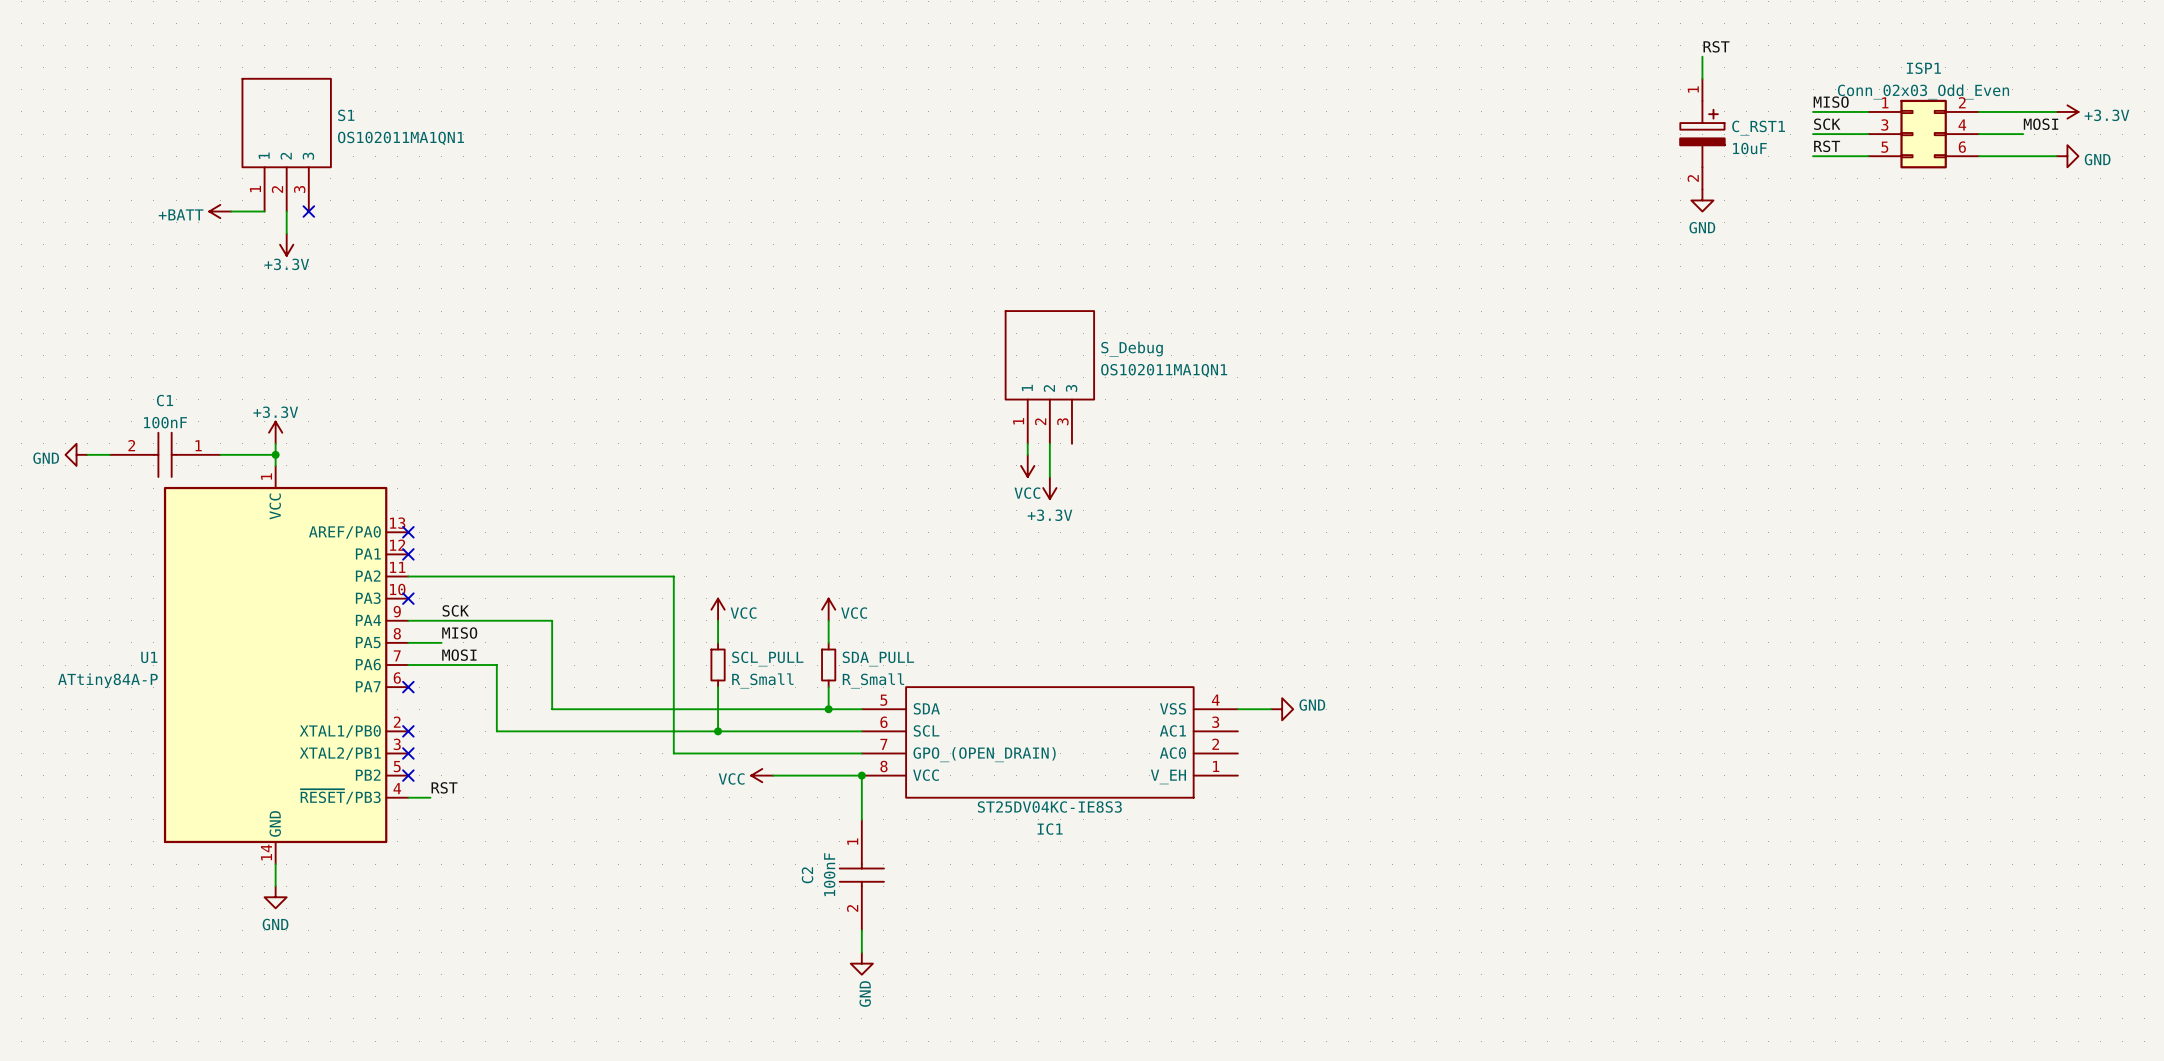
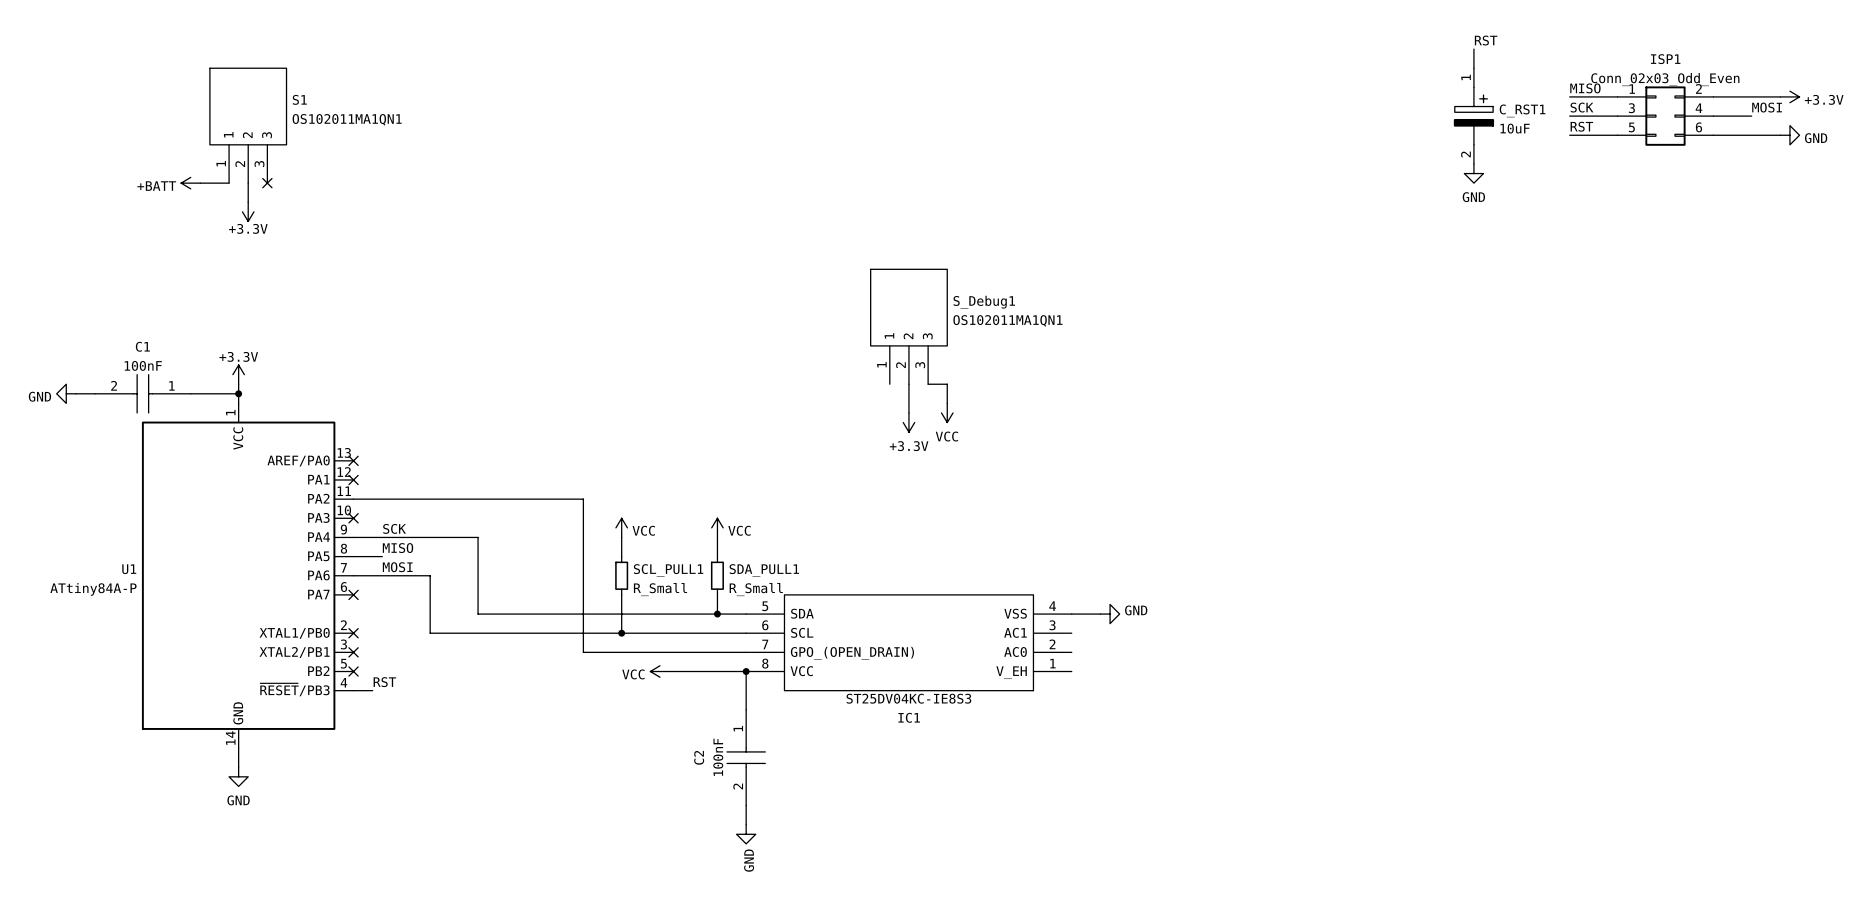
S_Debug name: S_Debug (1132, 349) -> S_Debug1 (984, 302)
wire: (1027, 443) (1027, 454) -> none
wire: none -> (928, 384) (947, 384) (947, 403)
power symbol position: VCC (1027, 465) -> VCC (947, 412)
SCL_PULL name: SCL_PULL (767, 659) -> SCL_PULL1 (668, 570)
SDA_PULL name: SDA_PULL (878, 659) -> SDA_PULL1 (764, 570)

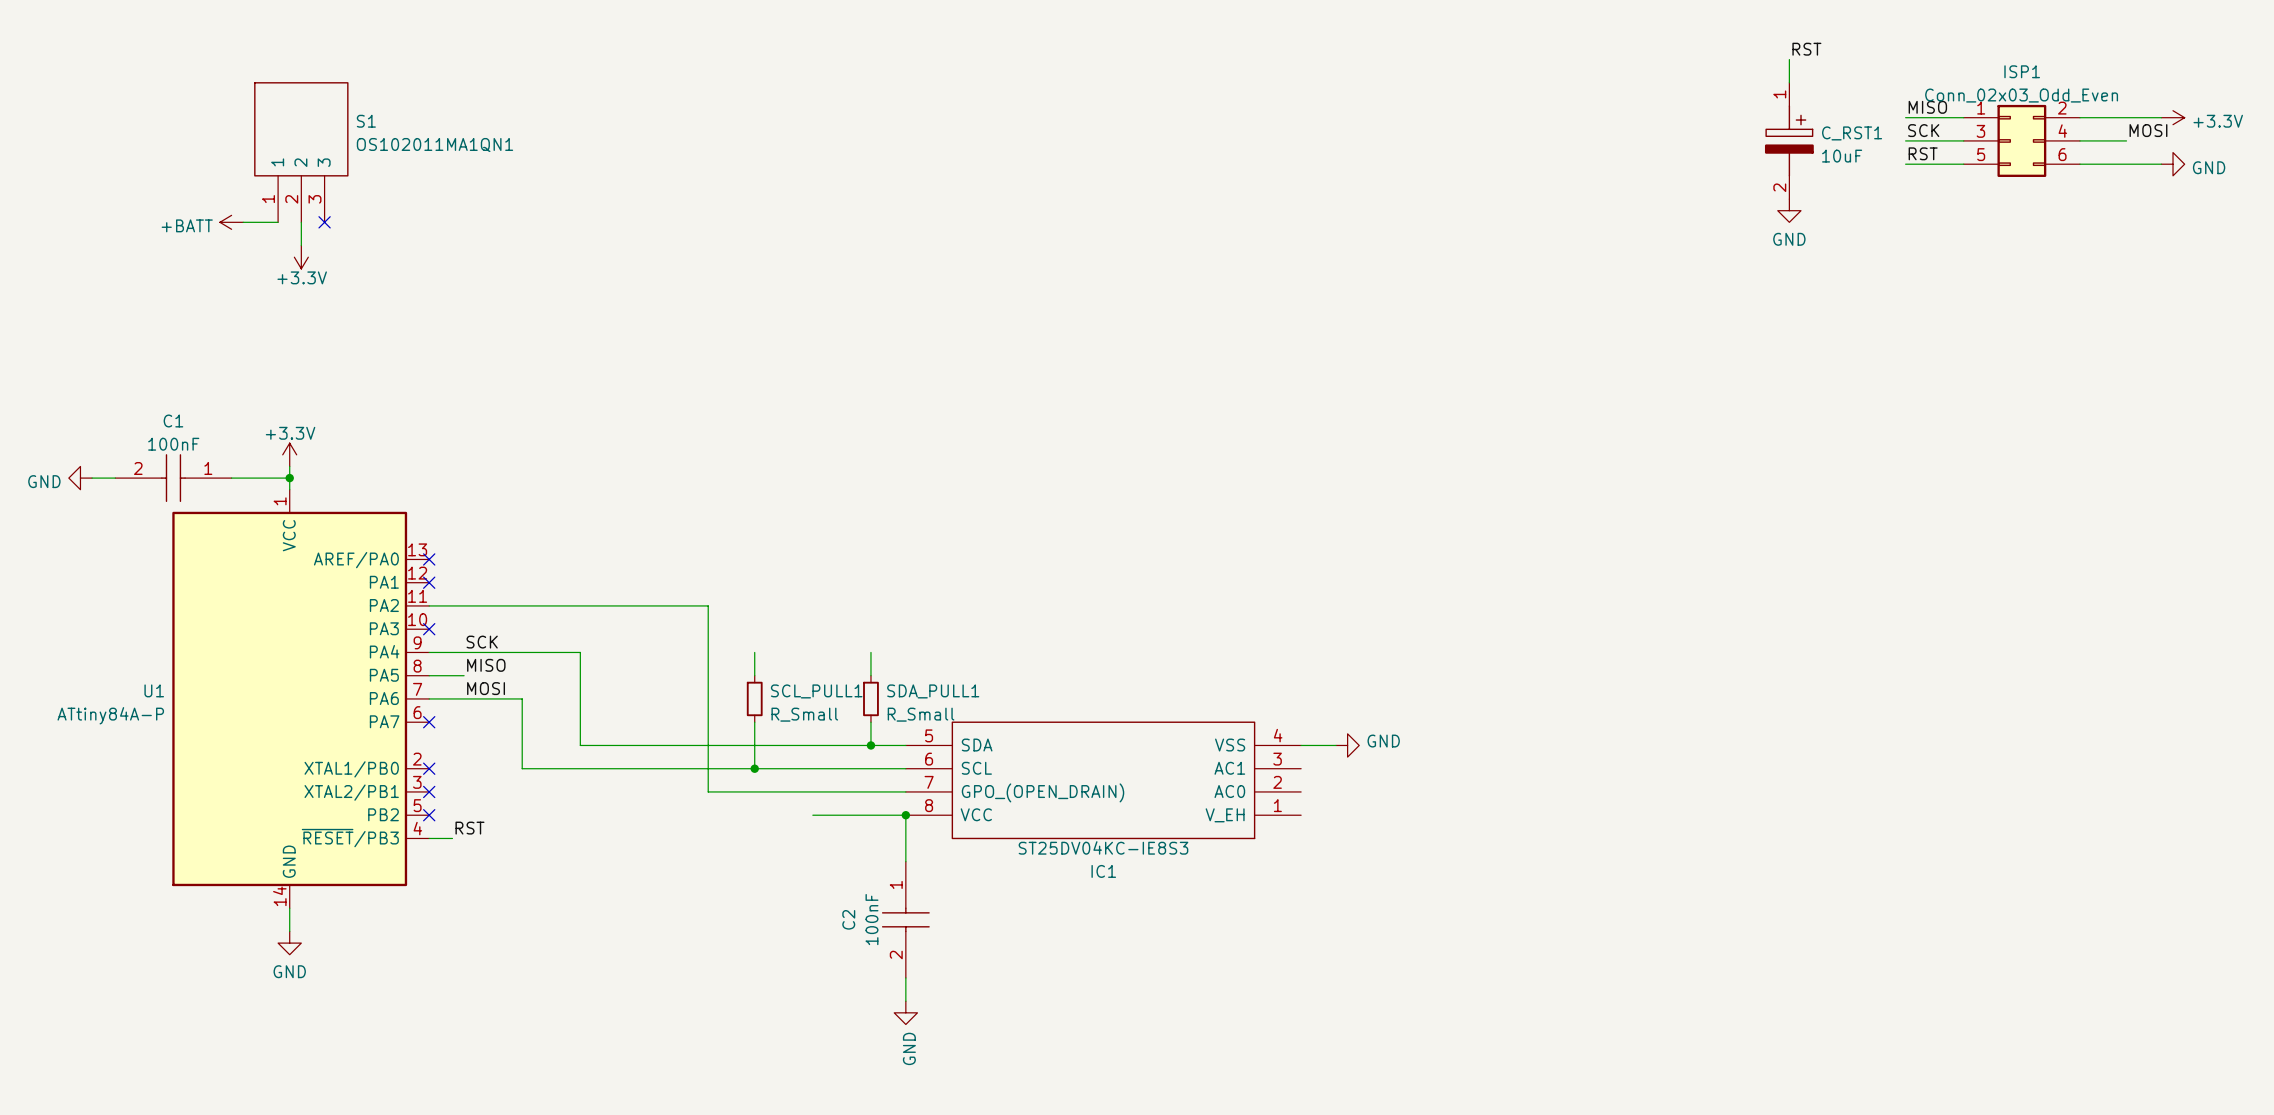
S_Debug1: OS102011MA1QN1 (908, 326) -> none
wire: (908, 384) (908, 412) -> none
wire: (928, 384) (947, 384) (947, 403) -> none
power symbol: VCC (947, 412) -> none
power symbol: +3.3V (908, 422) -> none
power symbol: VCC (621, 527) -> none
power symbol: VCC (717, 527) -> none
power symbol: VCC (659, 671) -> none

